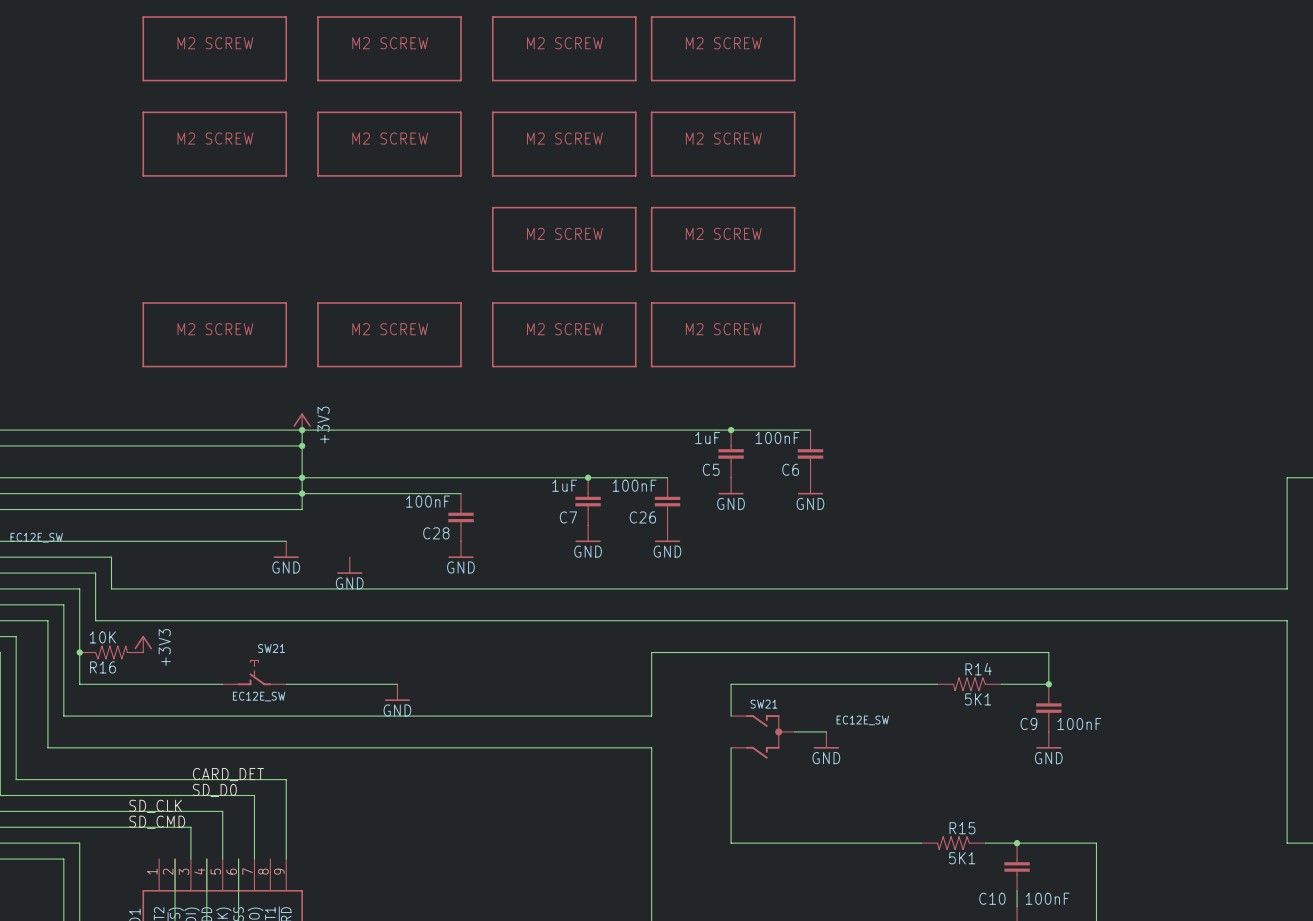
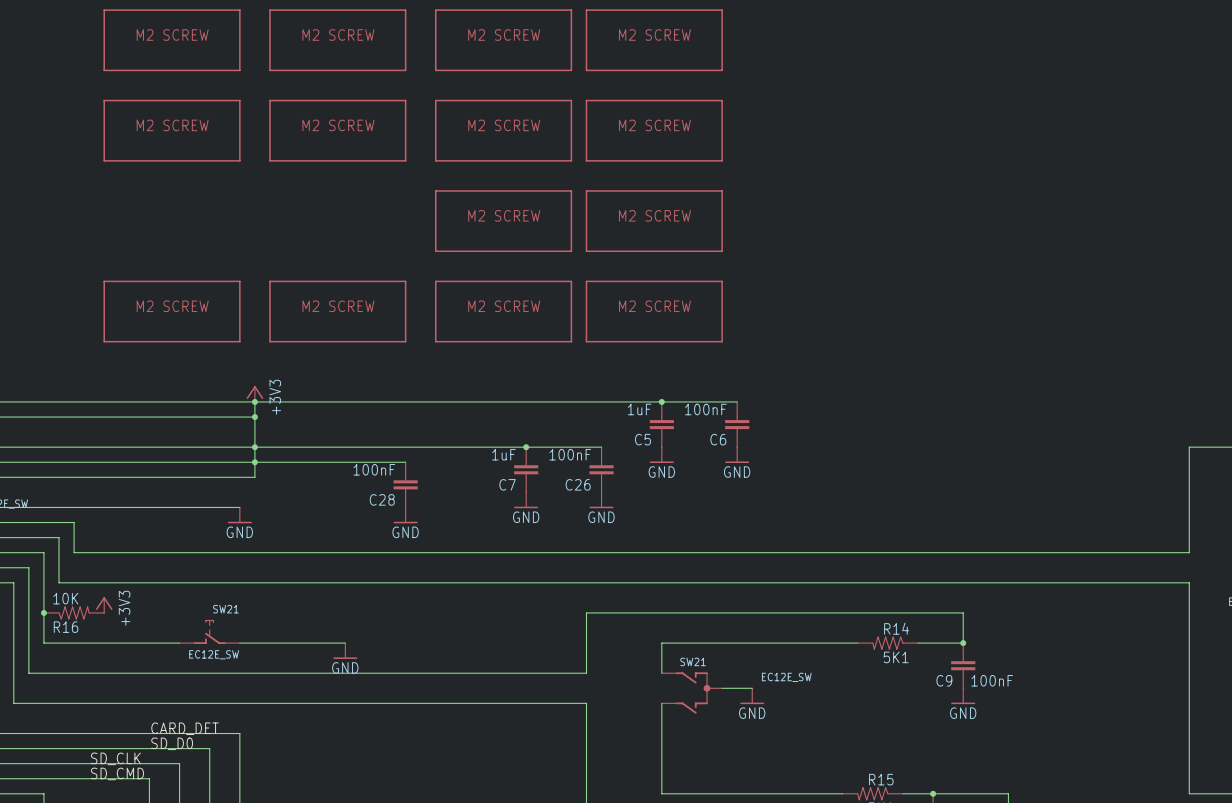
power symbol: GND (349, 565) -> none

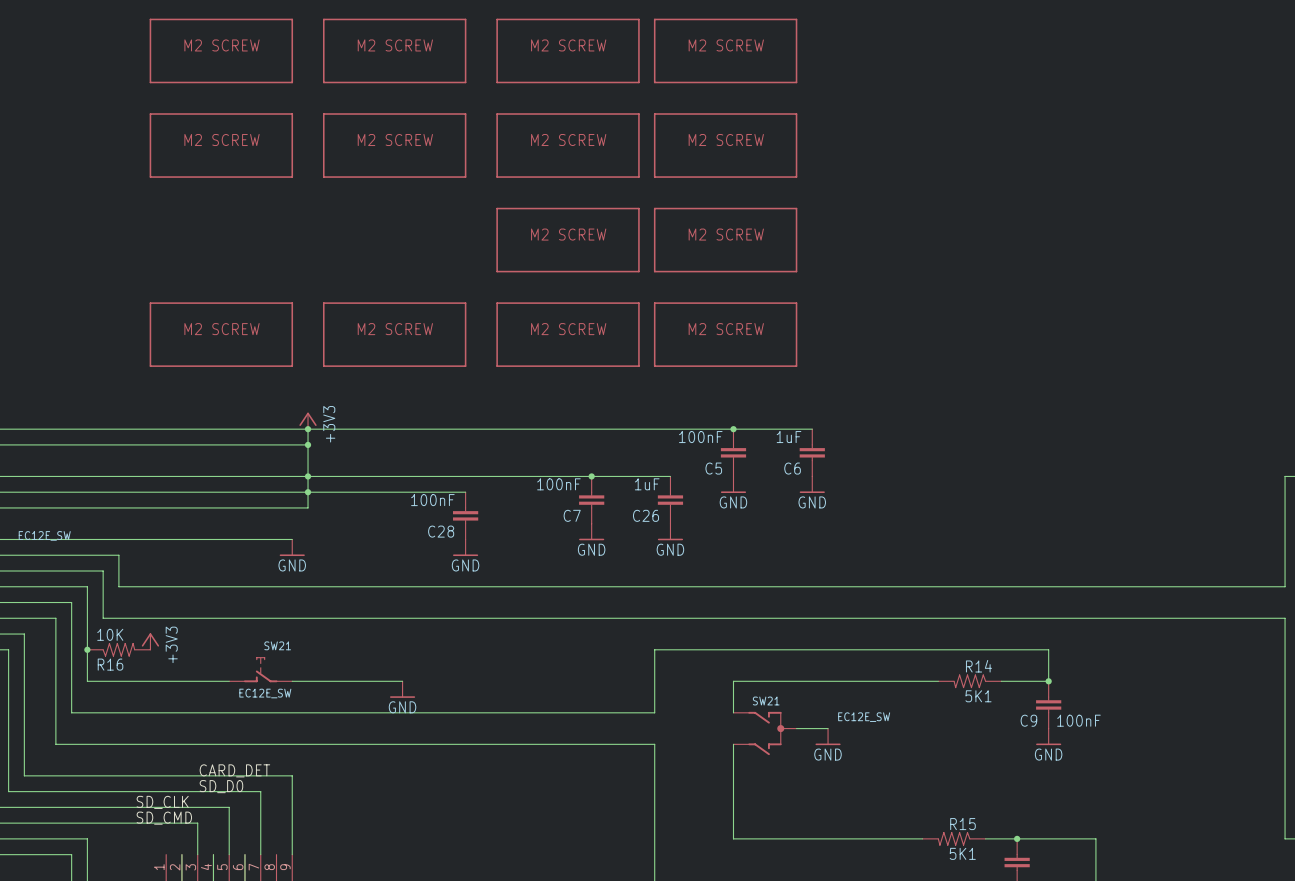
C5 value: 1uF (639, 409) -> 100nF (700, 437)
C6 value: 100nF (705, 409) -> 1uF (789, 437)
C7 value: 1uF (503, 454) -> 100nF (558, 484)
C26 value: 100nF (570, 454) -> 1uF (647, 484)

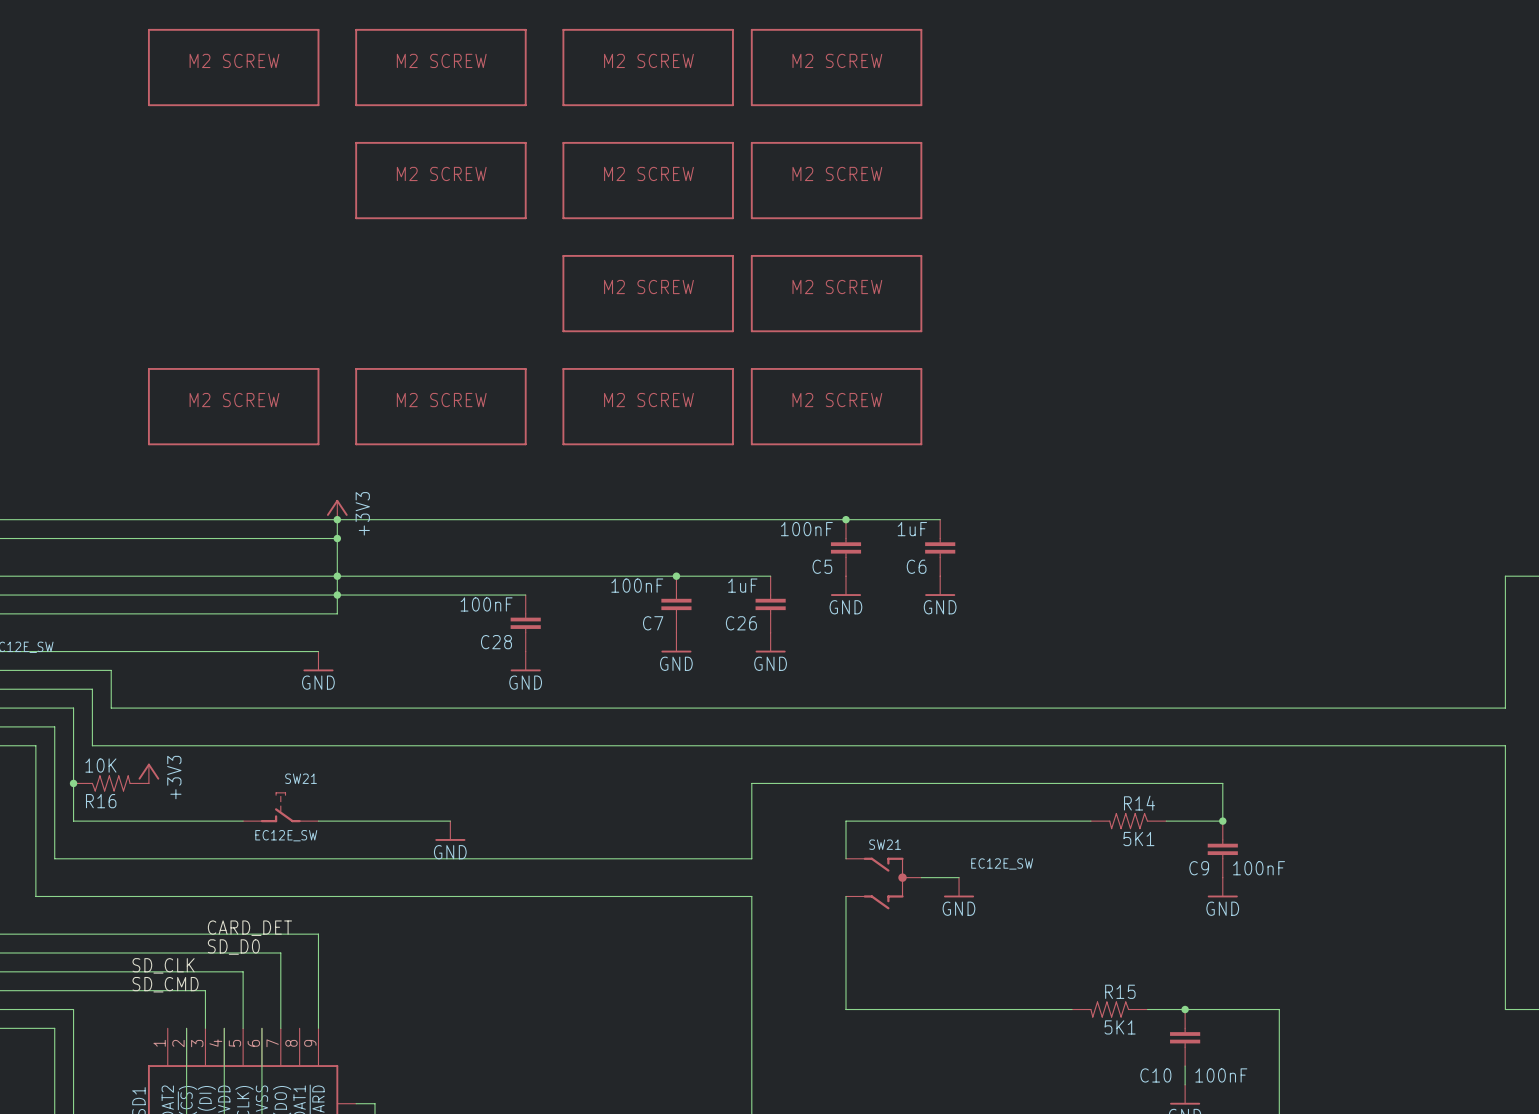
part: (221, 145) -> none

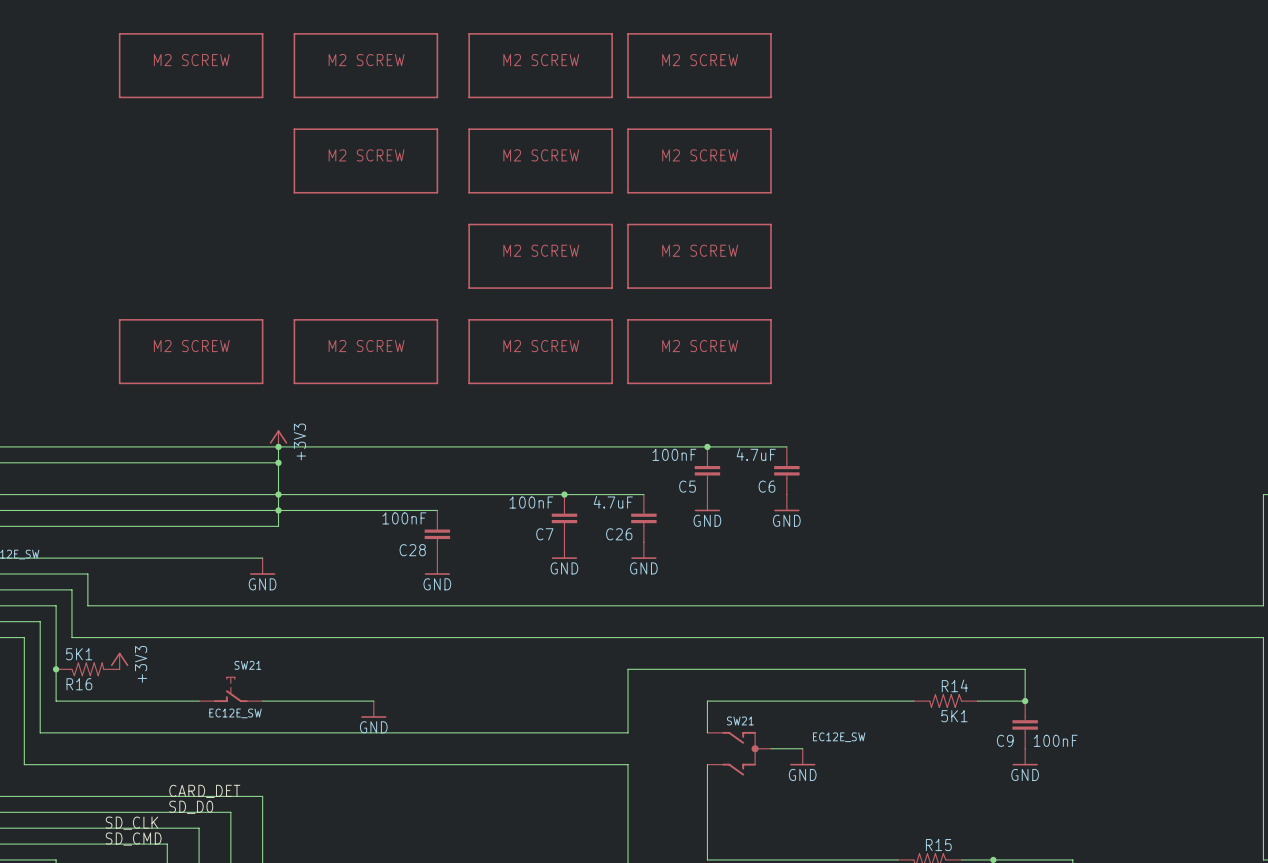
C6 value: 1uF (912, 529) -> 4.7uF (756, 454)
C26 value: 1uF (742, 585) -> 4.7uF (613, 502)
R16 value: 10K (100, 765) -> 5K1 (79, 654)

